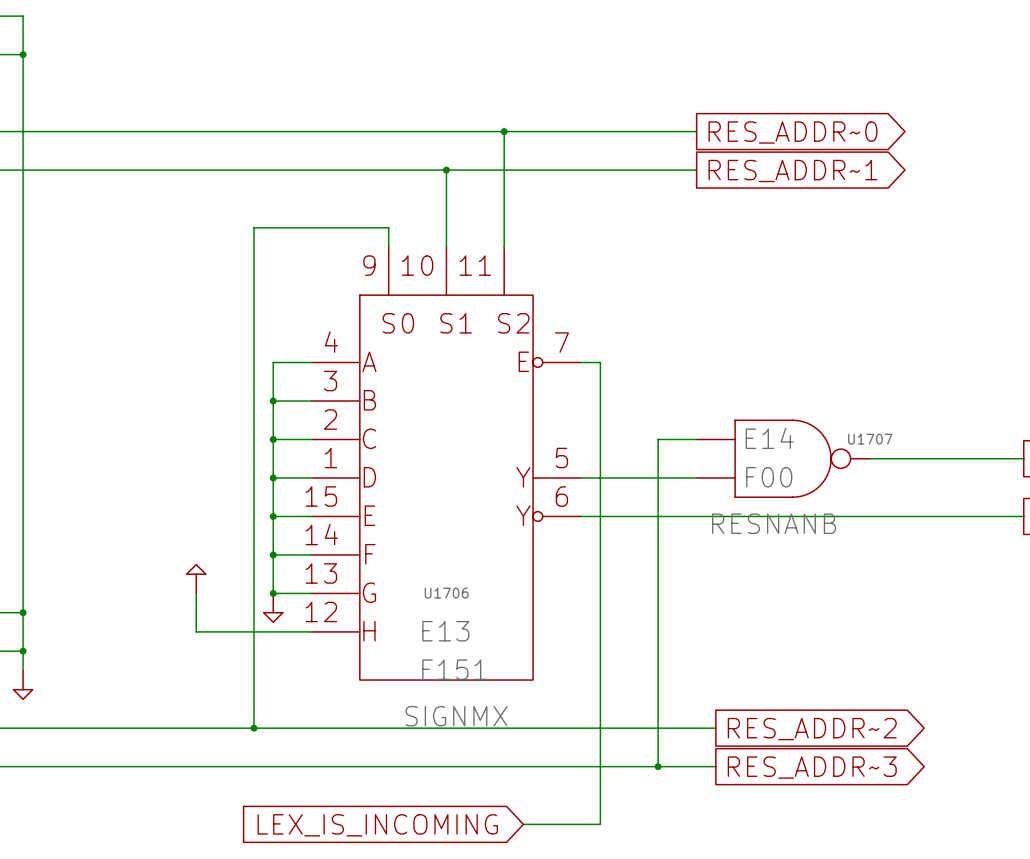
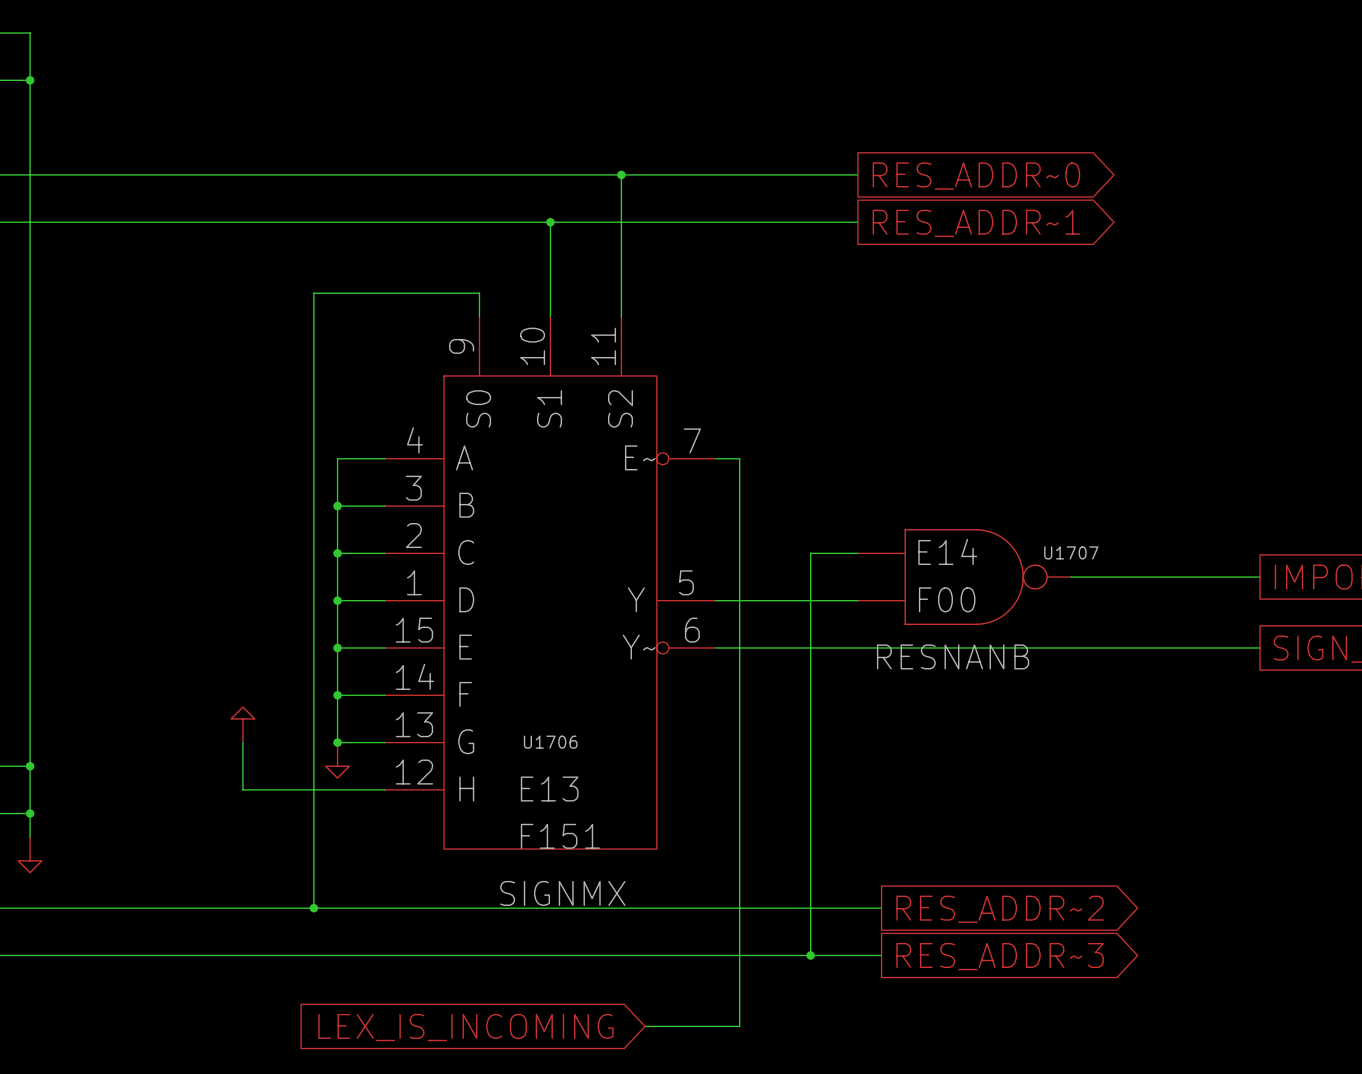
U1706 symbol: [311, 247, 582, 681] -> [384, 316, 717, 850]

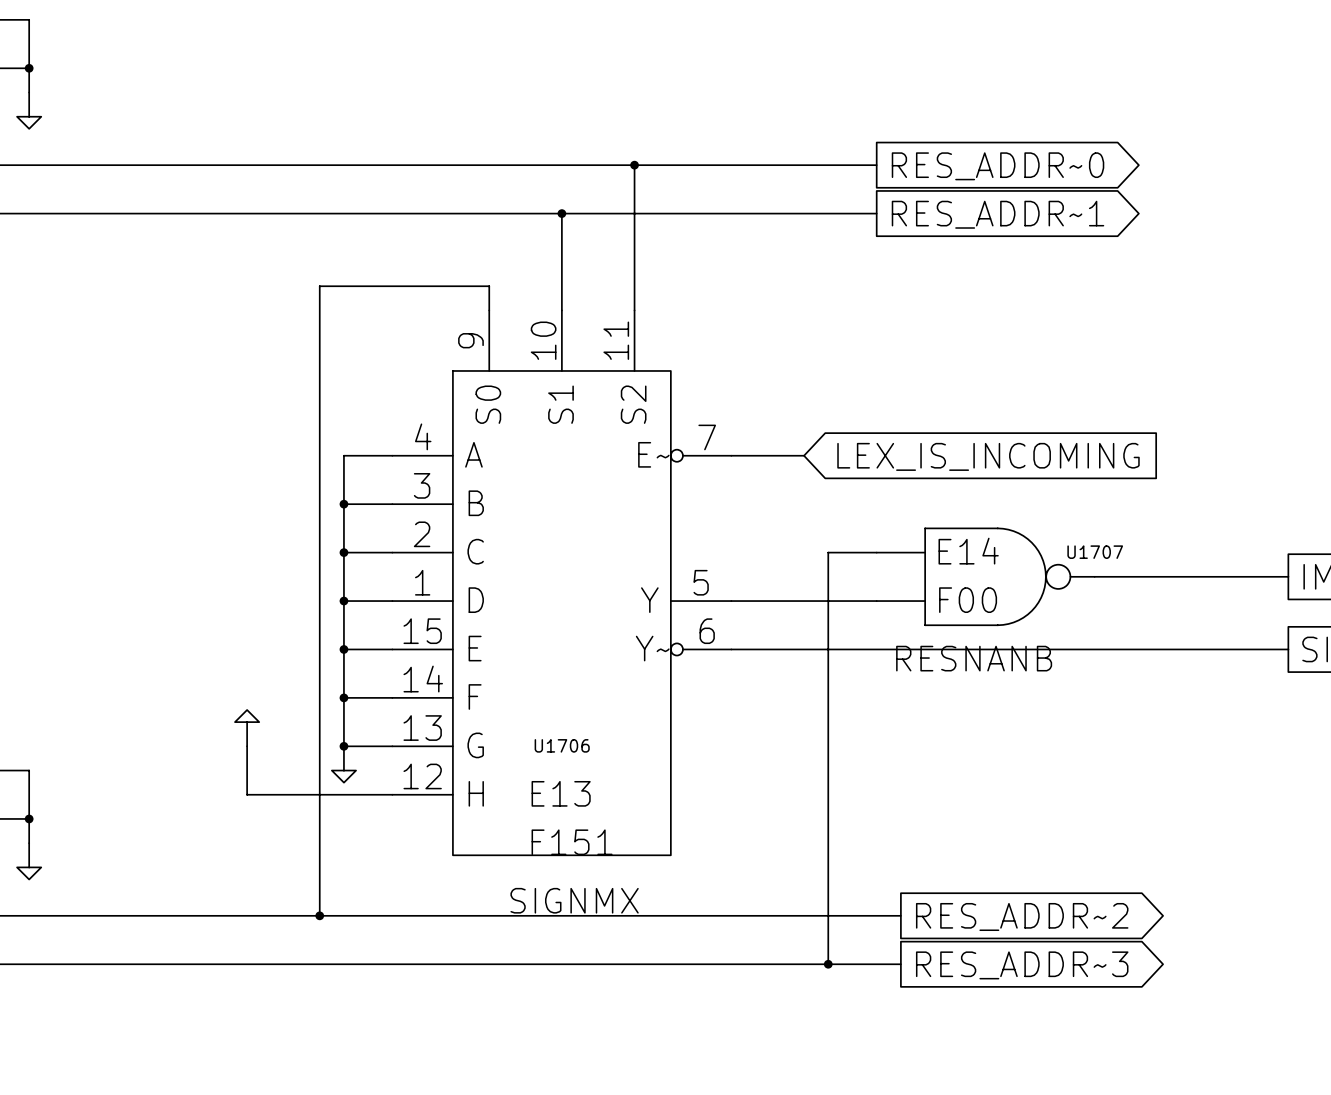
wire: (30, 103) (30, 766) -> none
power symbol: none -> (29, 111)
wire: (739, 458) (739, 1026) (645, 1026) -> (755, 455) (804, 455)
global label: none -> LEX_IS_INCOMING (988, 456)
junction: (30, 766) -> none
global label: LEX_IS_INCOMING (466, 1027) -> none

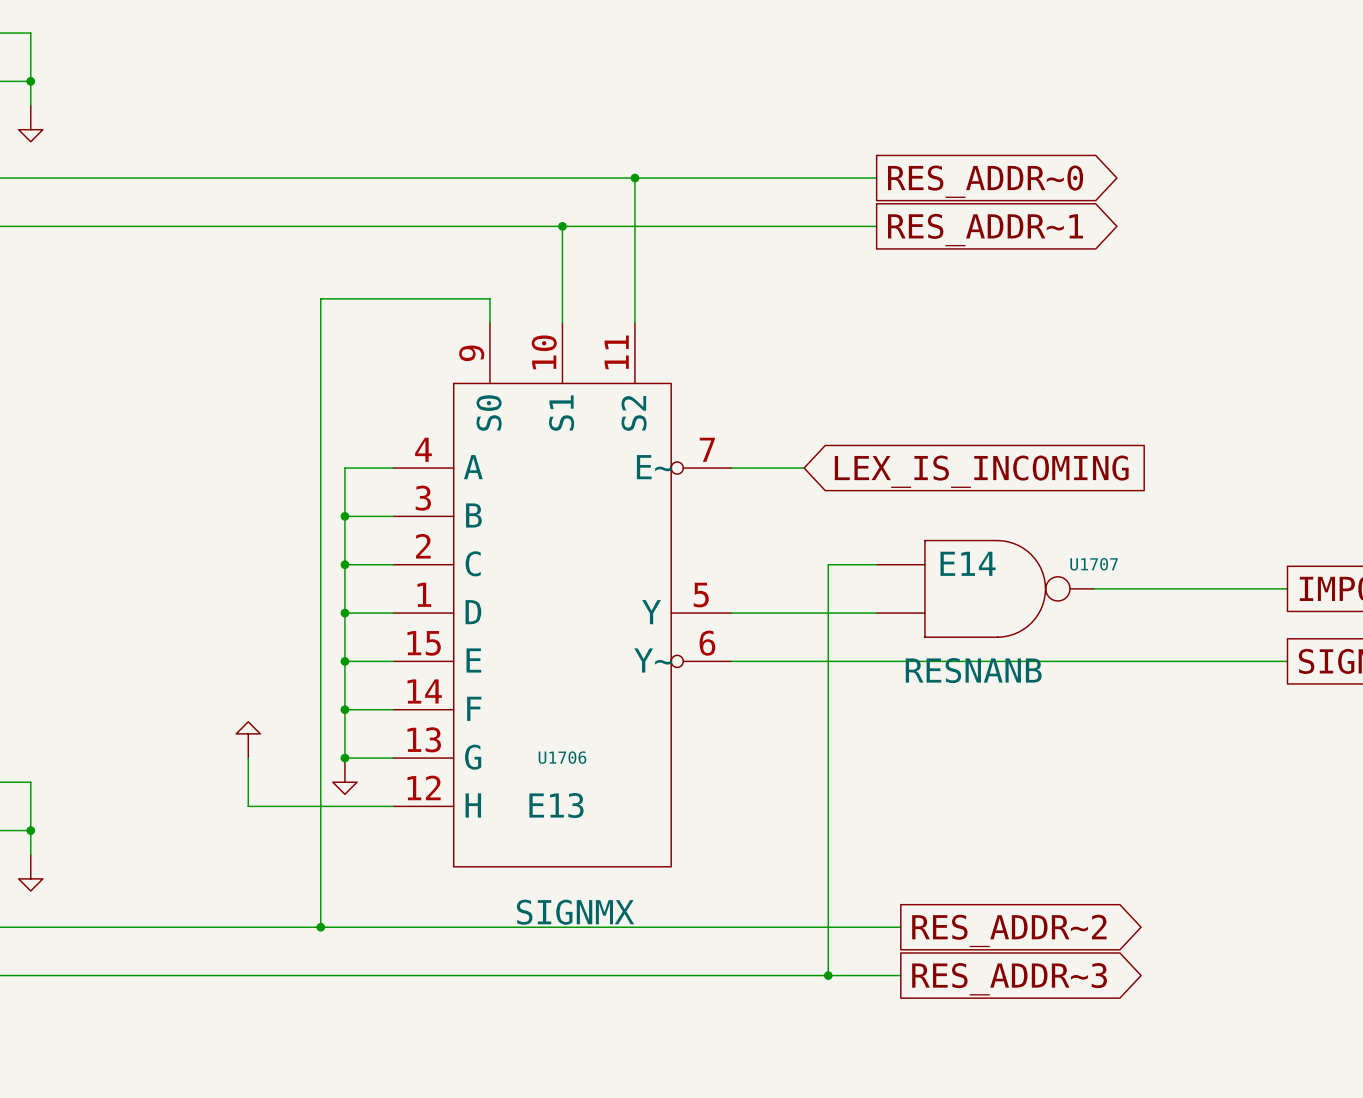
U1707 value: F00 (968, 600) -> none
U1706 value: F151 (572, 842) -> none

